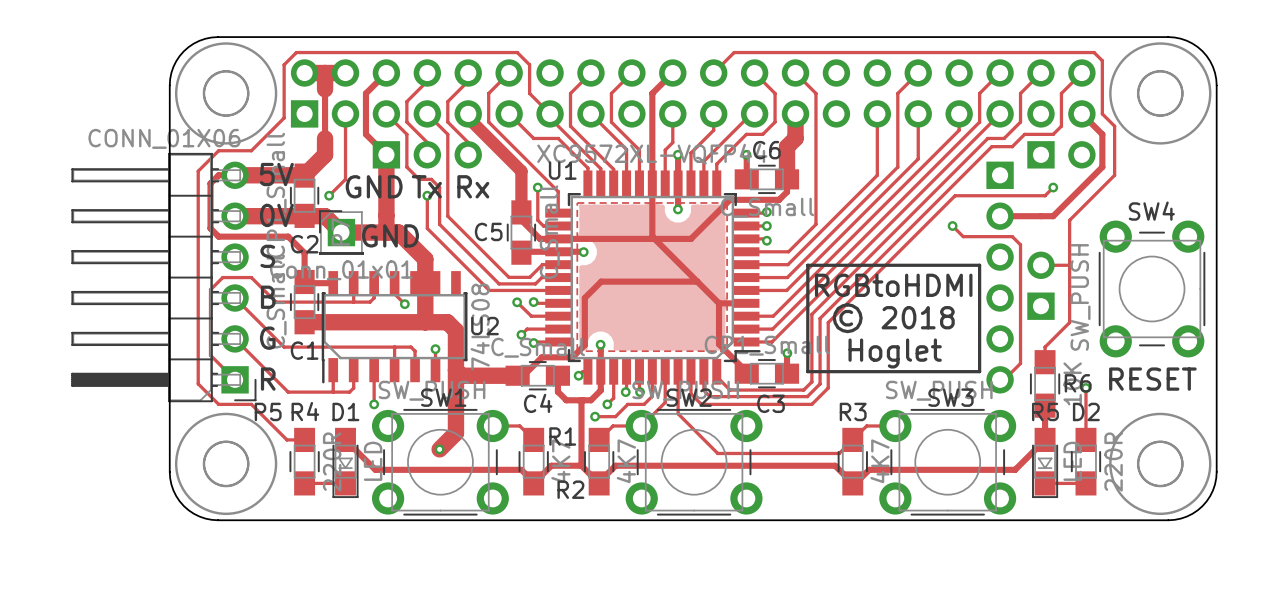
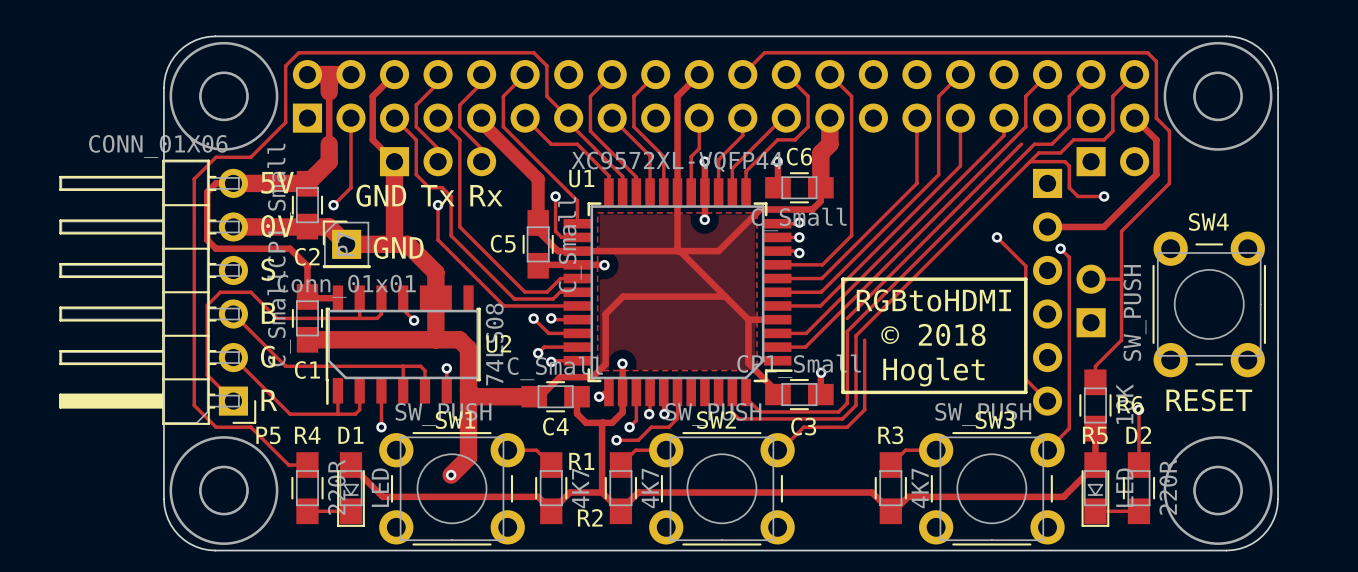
track: (1000, 113) (975, 138) -> none
track: (1053, 187) (1045, 195) (955, 195) (828, 322) -> (1104, 196) (1078, 196) (1069, 187) (1069, 166) (1064, 161) (1030, 161)
track: (963, 236) (1012, 236) -> (1008, 248) (1025, 266) (1025, 379) (1047, 401)
via: none -> (1060, 248)
track: (811, 302) (772, 341) (746, 341) -> none
track: (1020, 363) (1004, 379) -> (1069, 383) (1069, 428) (1047, 450)
track: (665, 371) (665, 402) (641, 425) -> none
track: (678, 371) (678, 413) (717, 453) (839, 453) (852, 439) -> none
track: (690, 371) (690, 393) (701, 404) (770, 404) -> (777, 450) (780, 450) (803, 427)

